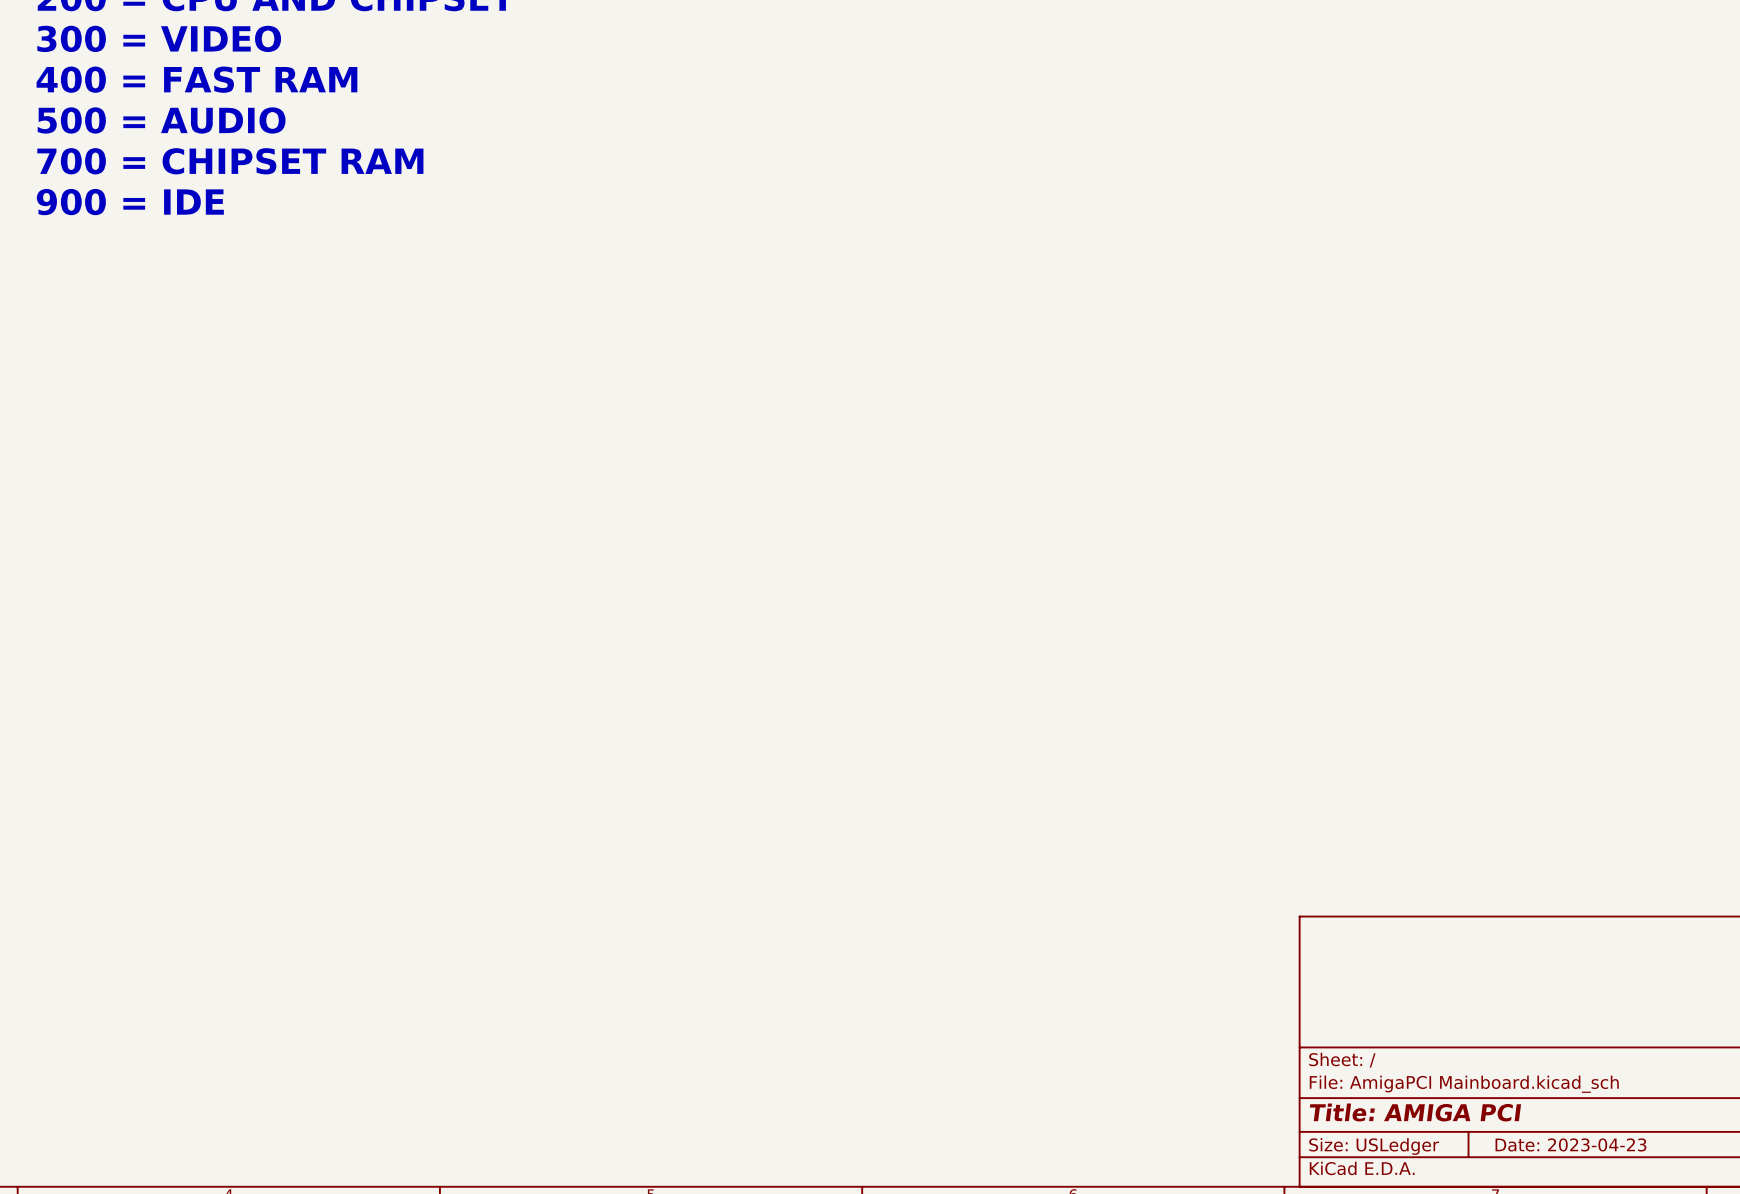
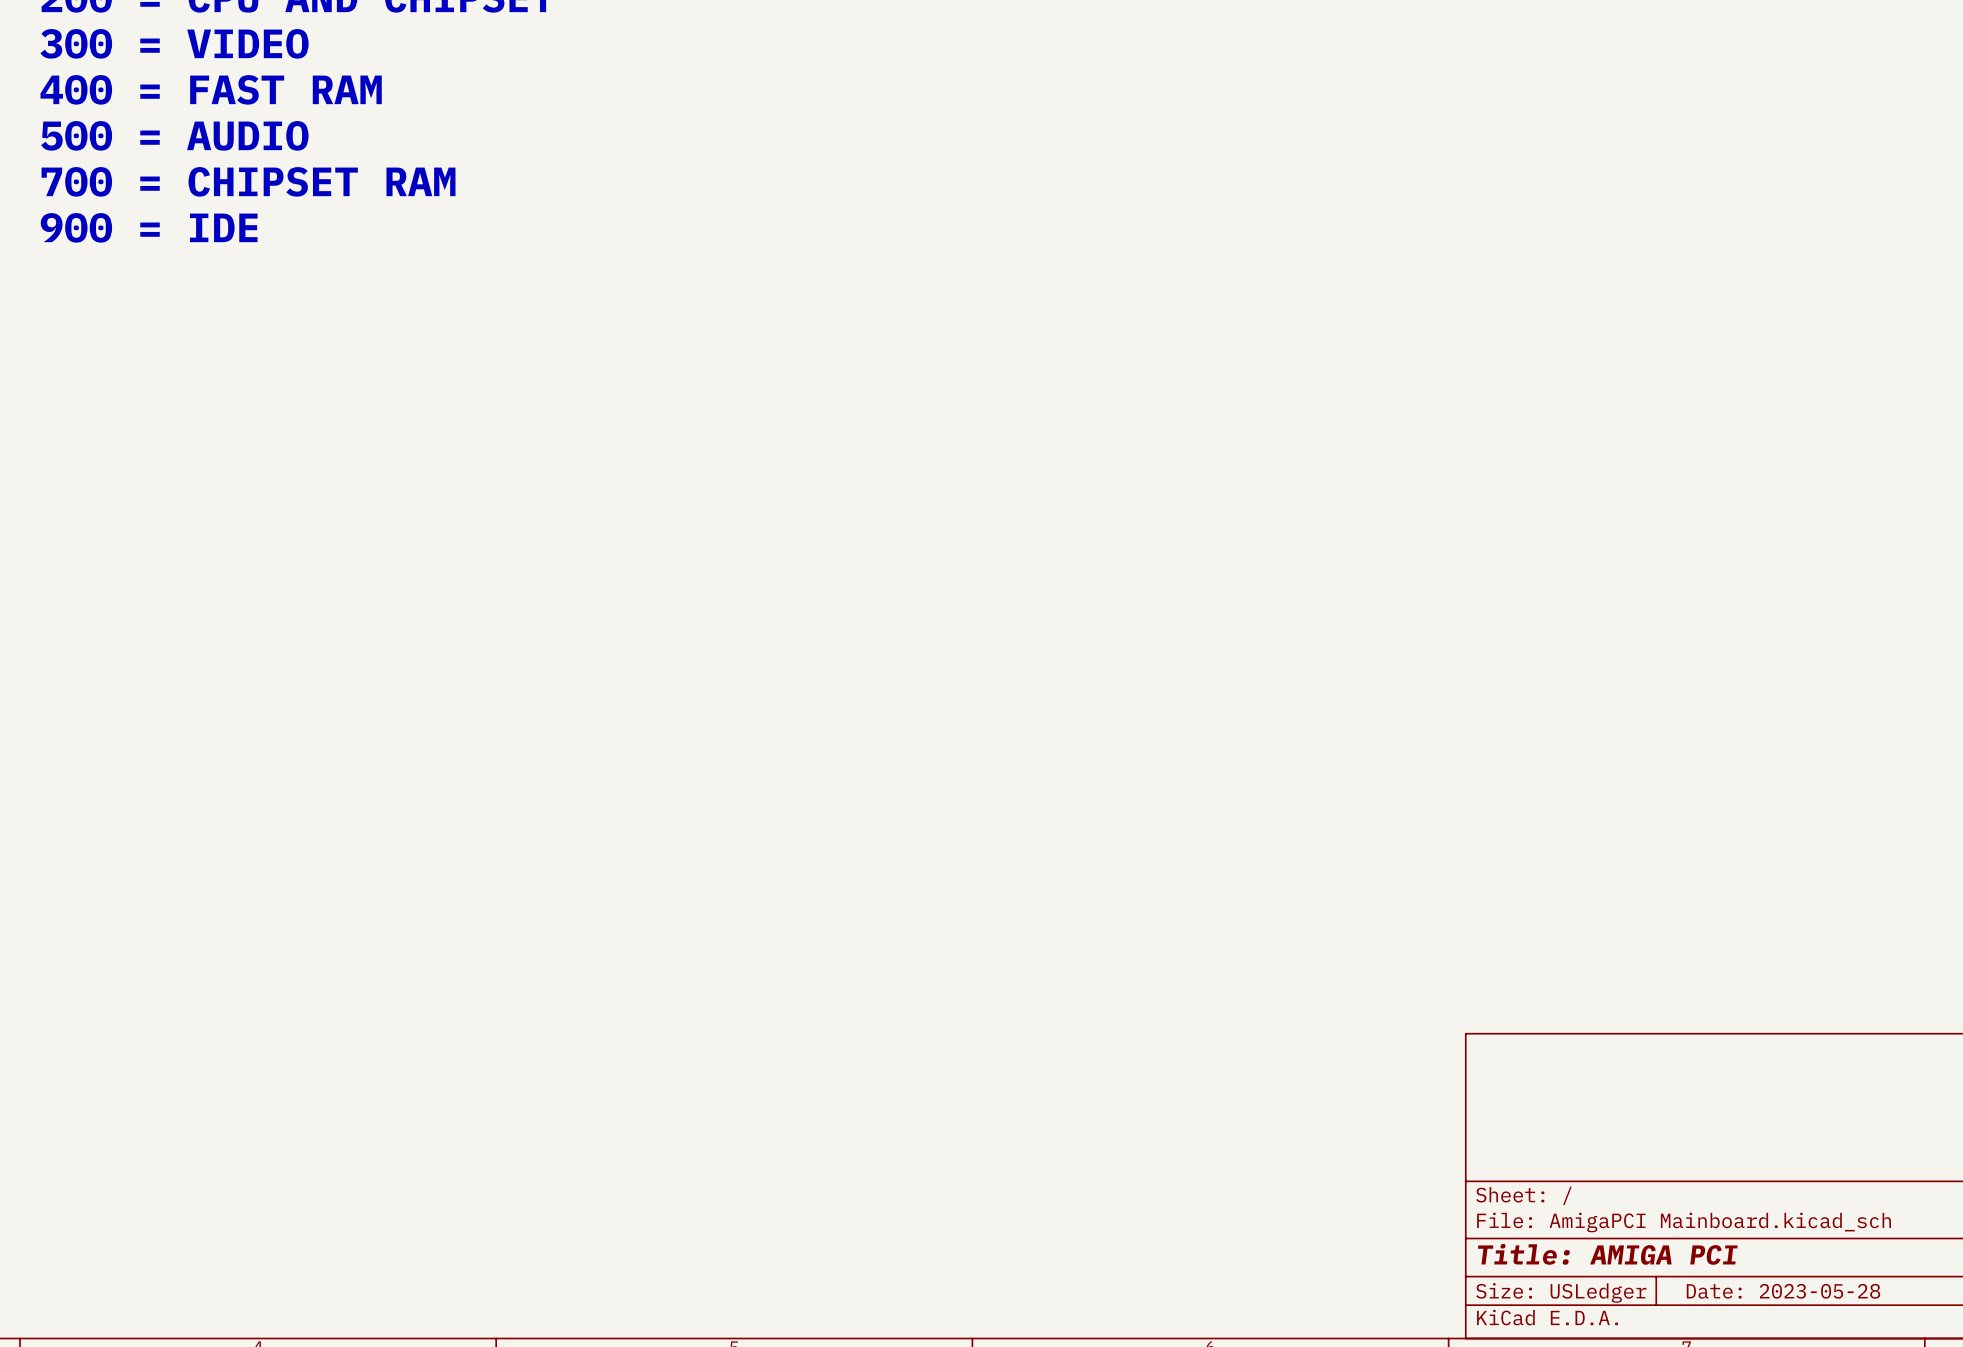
title block: Date: 2023-04-23 (1570, 1144) -> Date: 2023-05-28 (1783, 1291)

